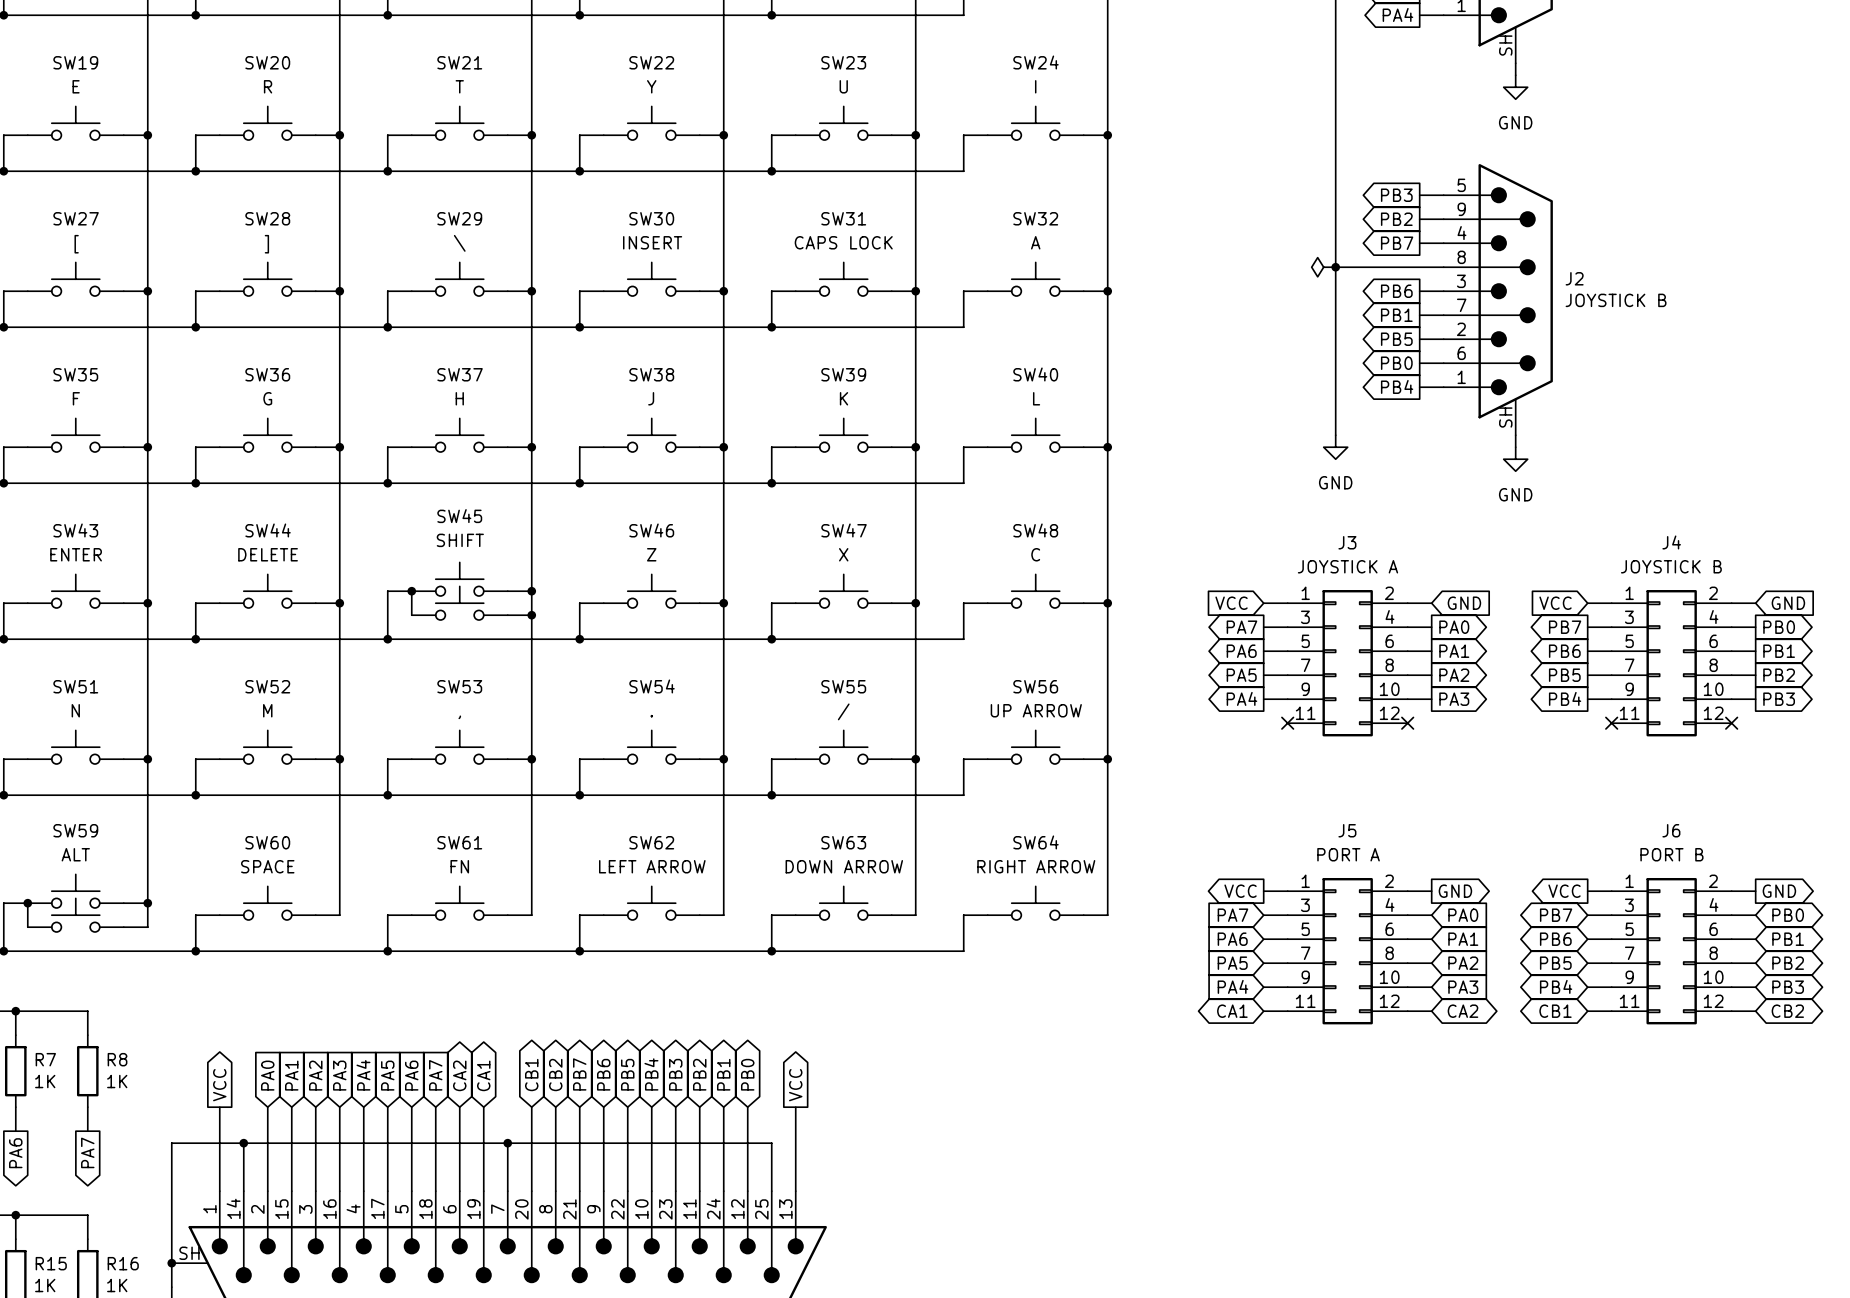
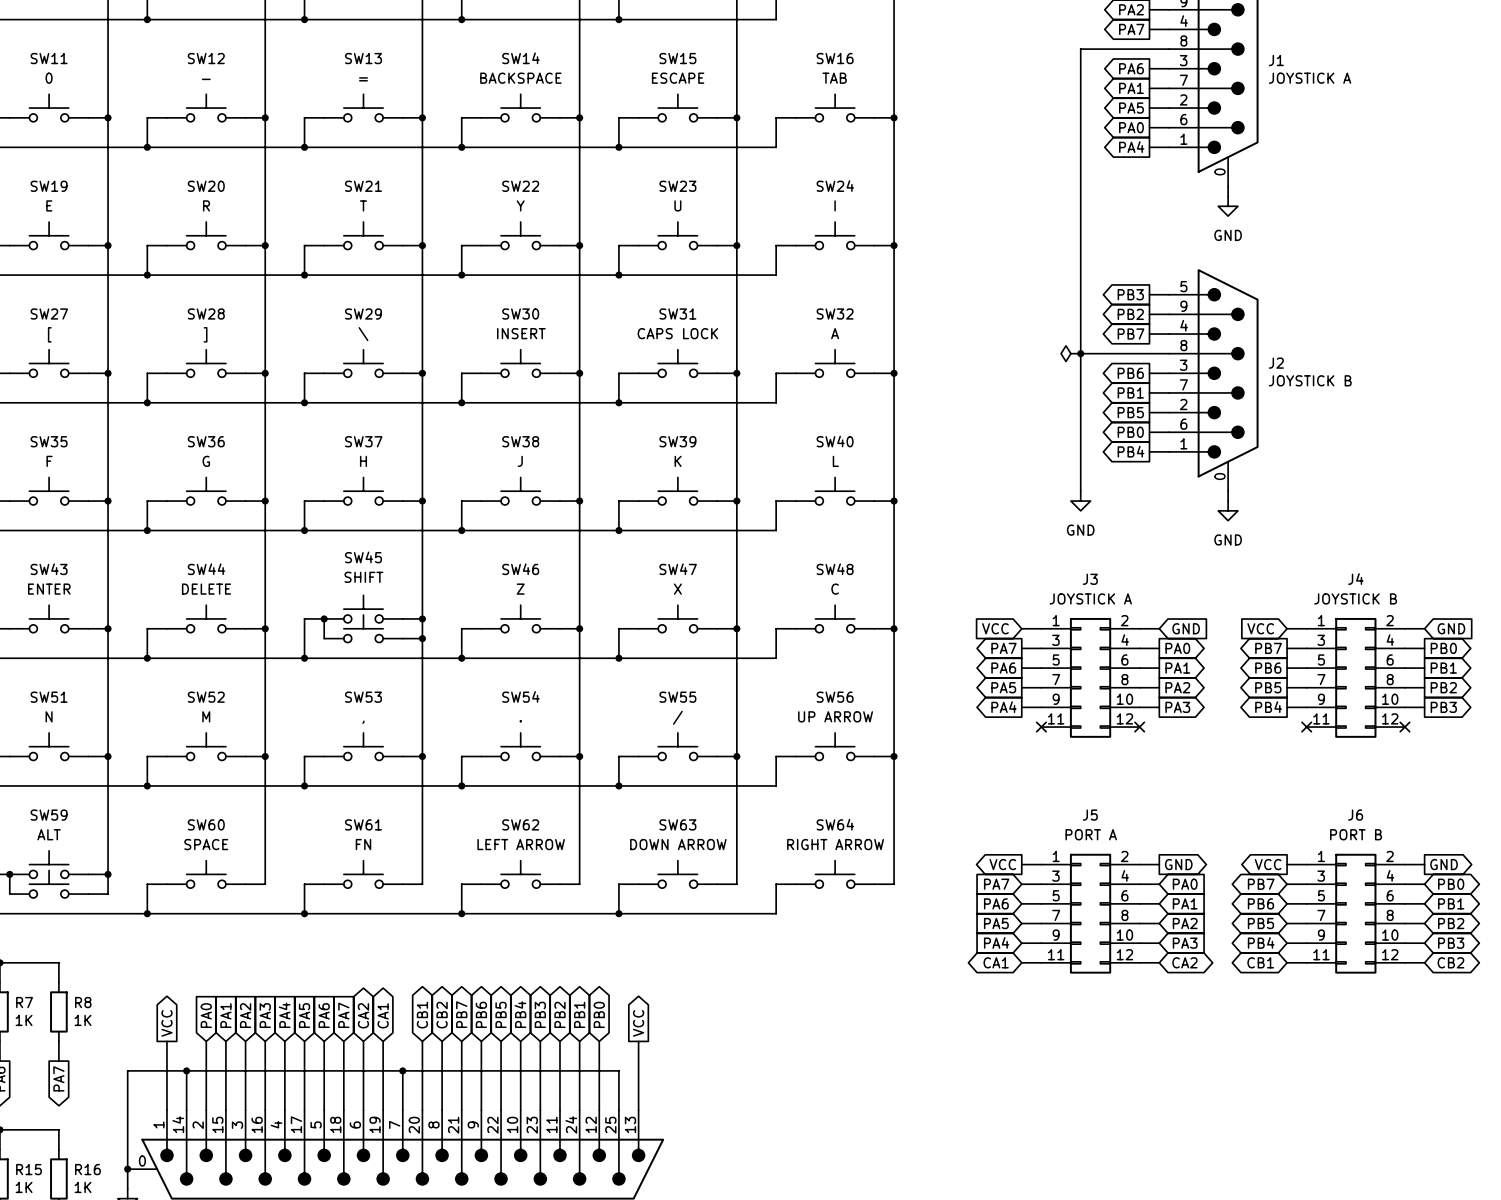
J1 pin number: SH (1505, 45) -> 0 (1219, 171)
J2 pin number: SH (1505, 417) -> 0 (1219, 476)
part pin number: SH (189, 1253) -> 0 (142, 1161)

